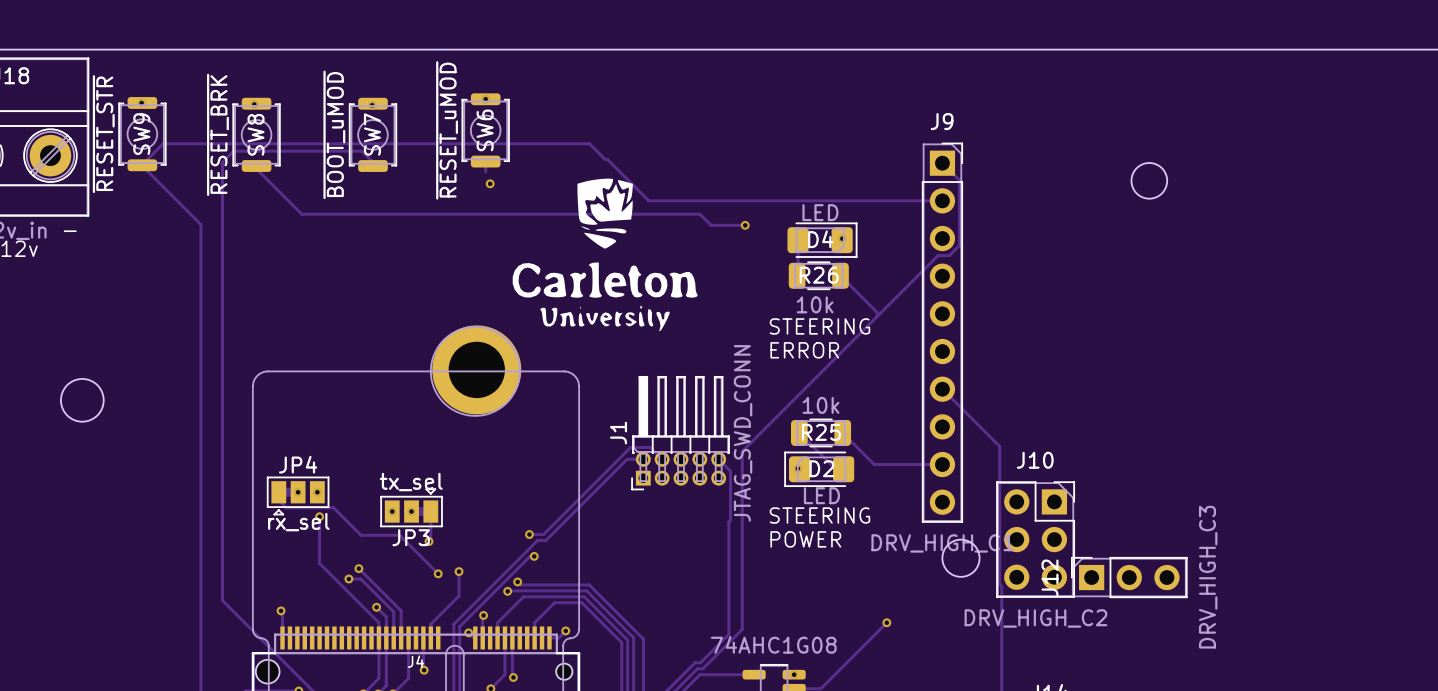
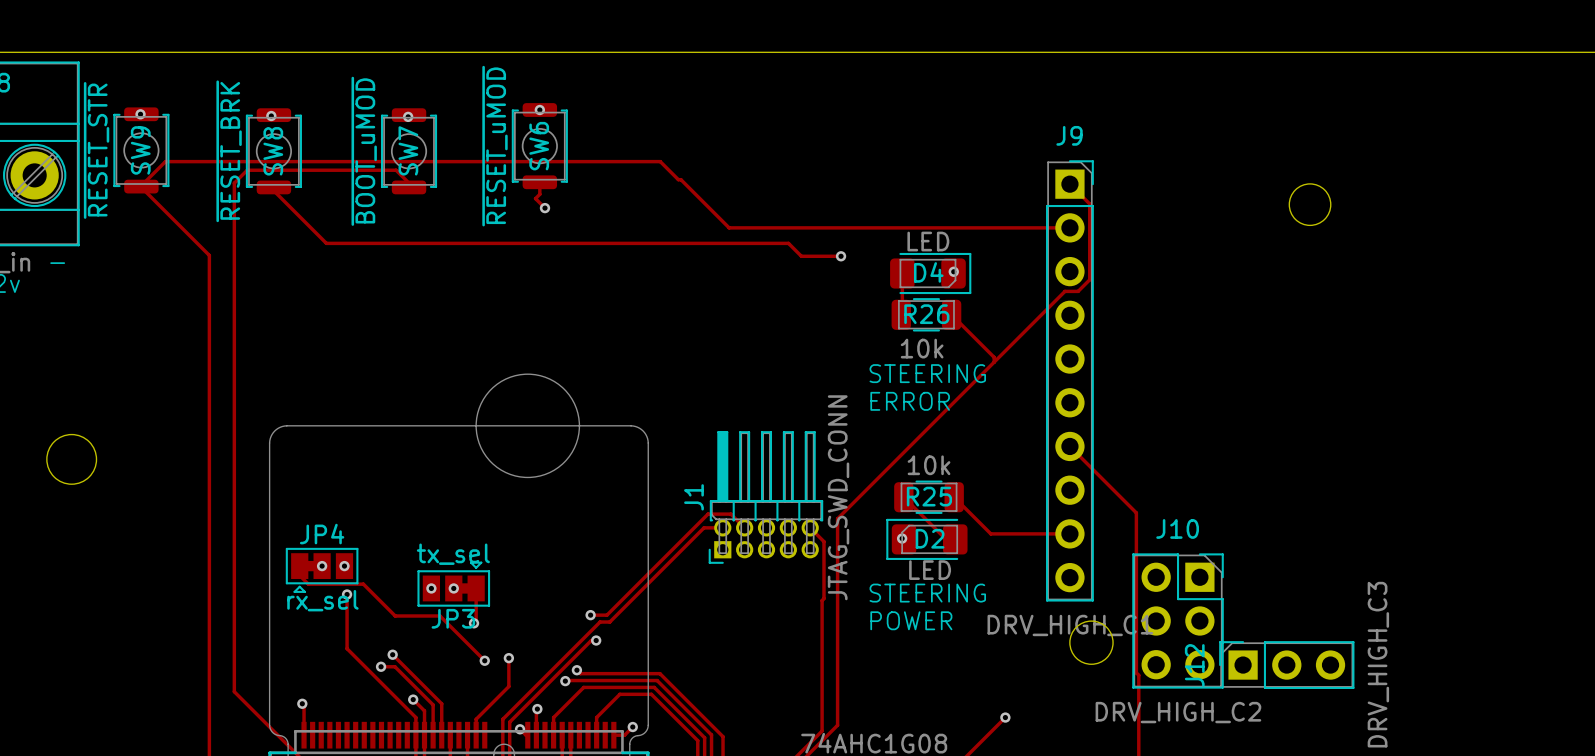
track: none -> (539, 194) (535, 198) (544, 208)
drawing: [512, 178, 698, 332] -> none
part: (476, 369) -> none

